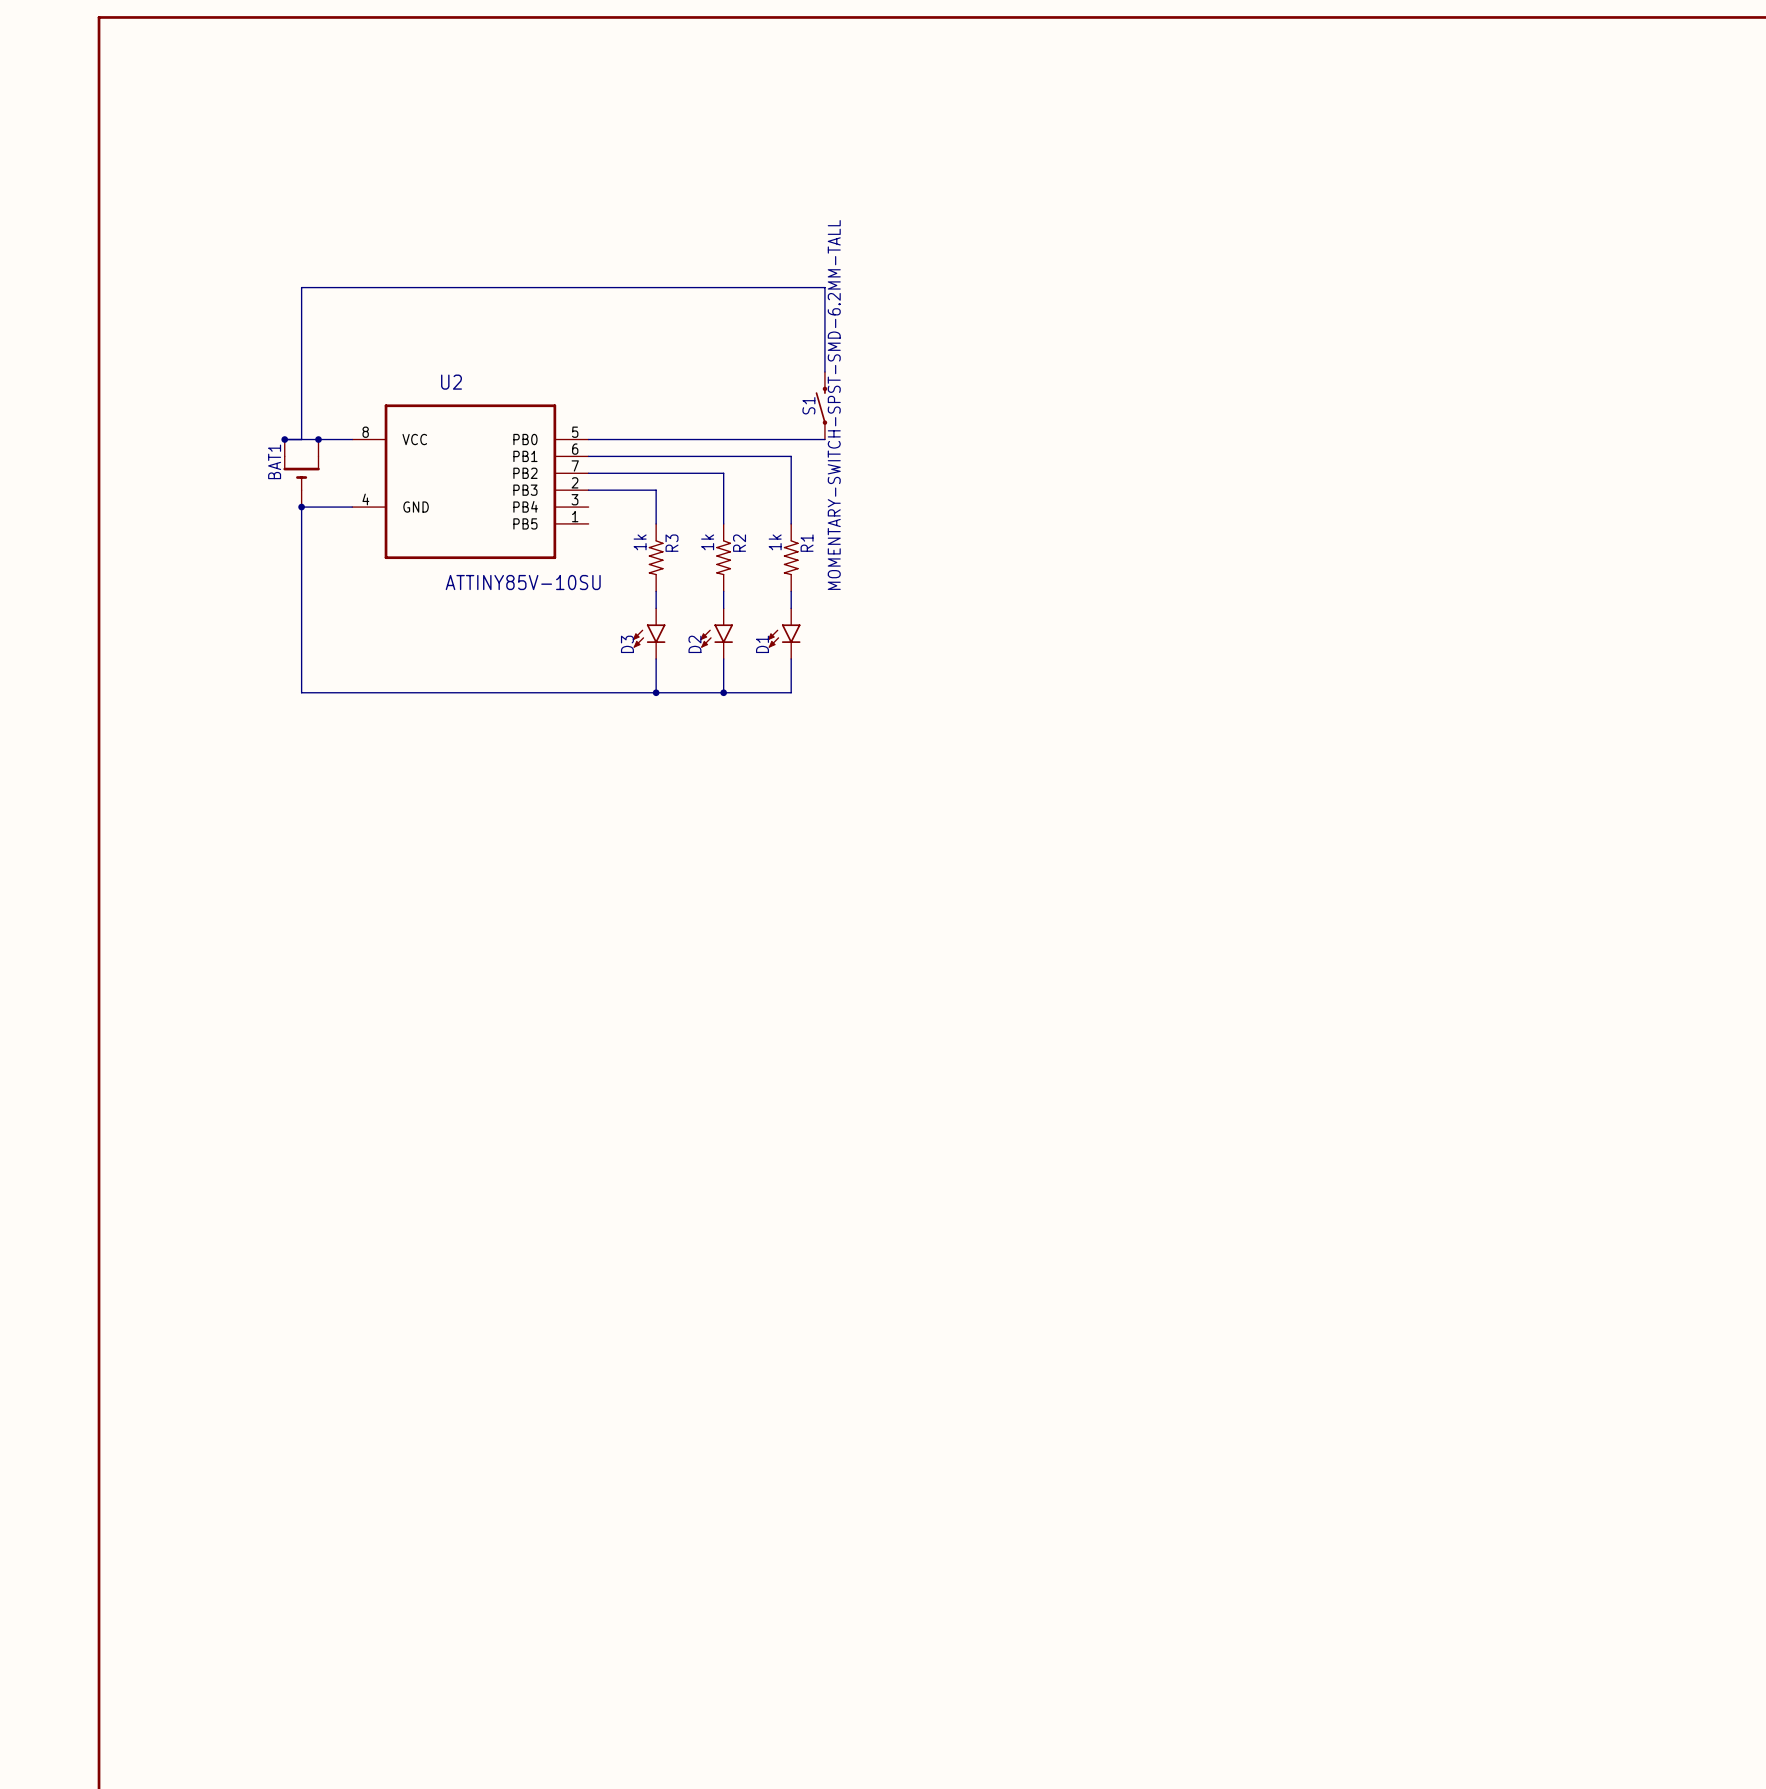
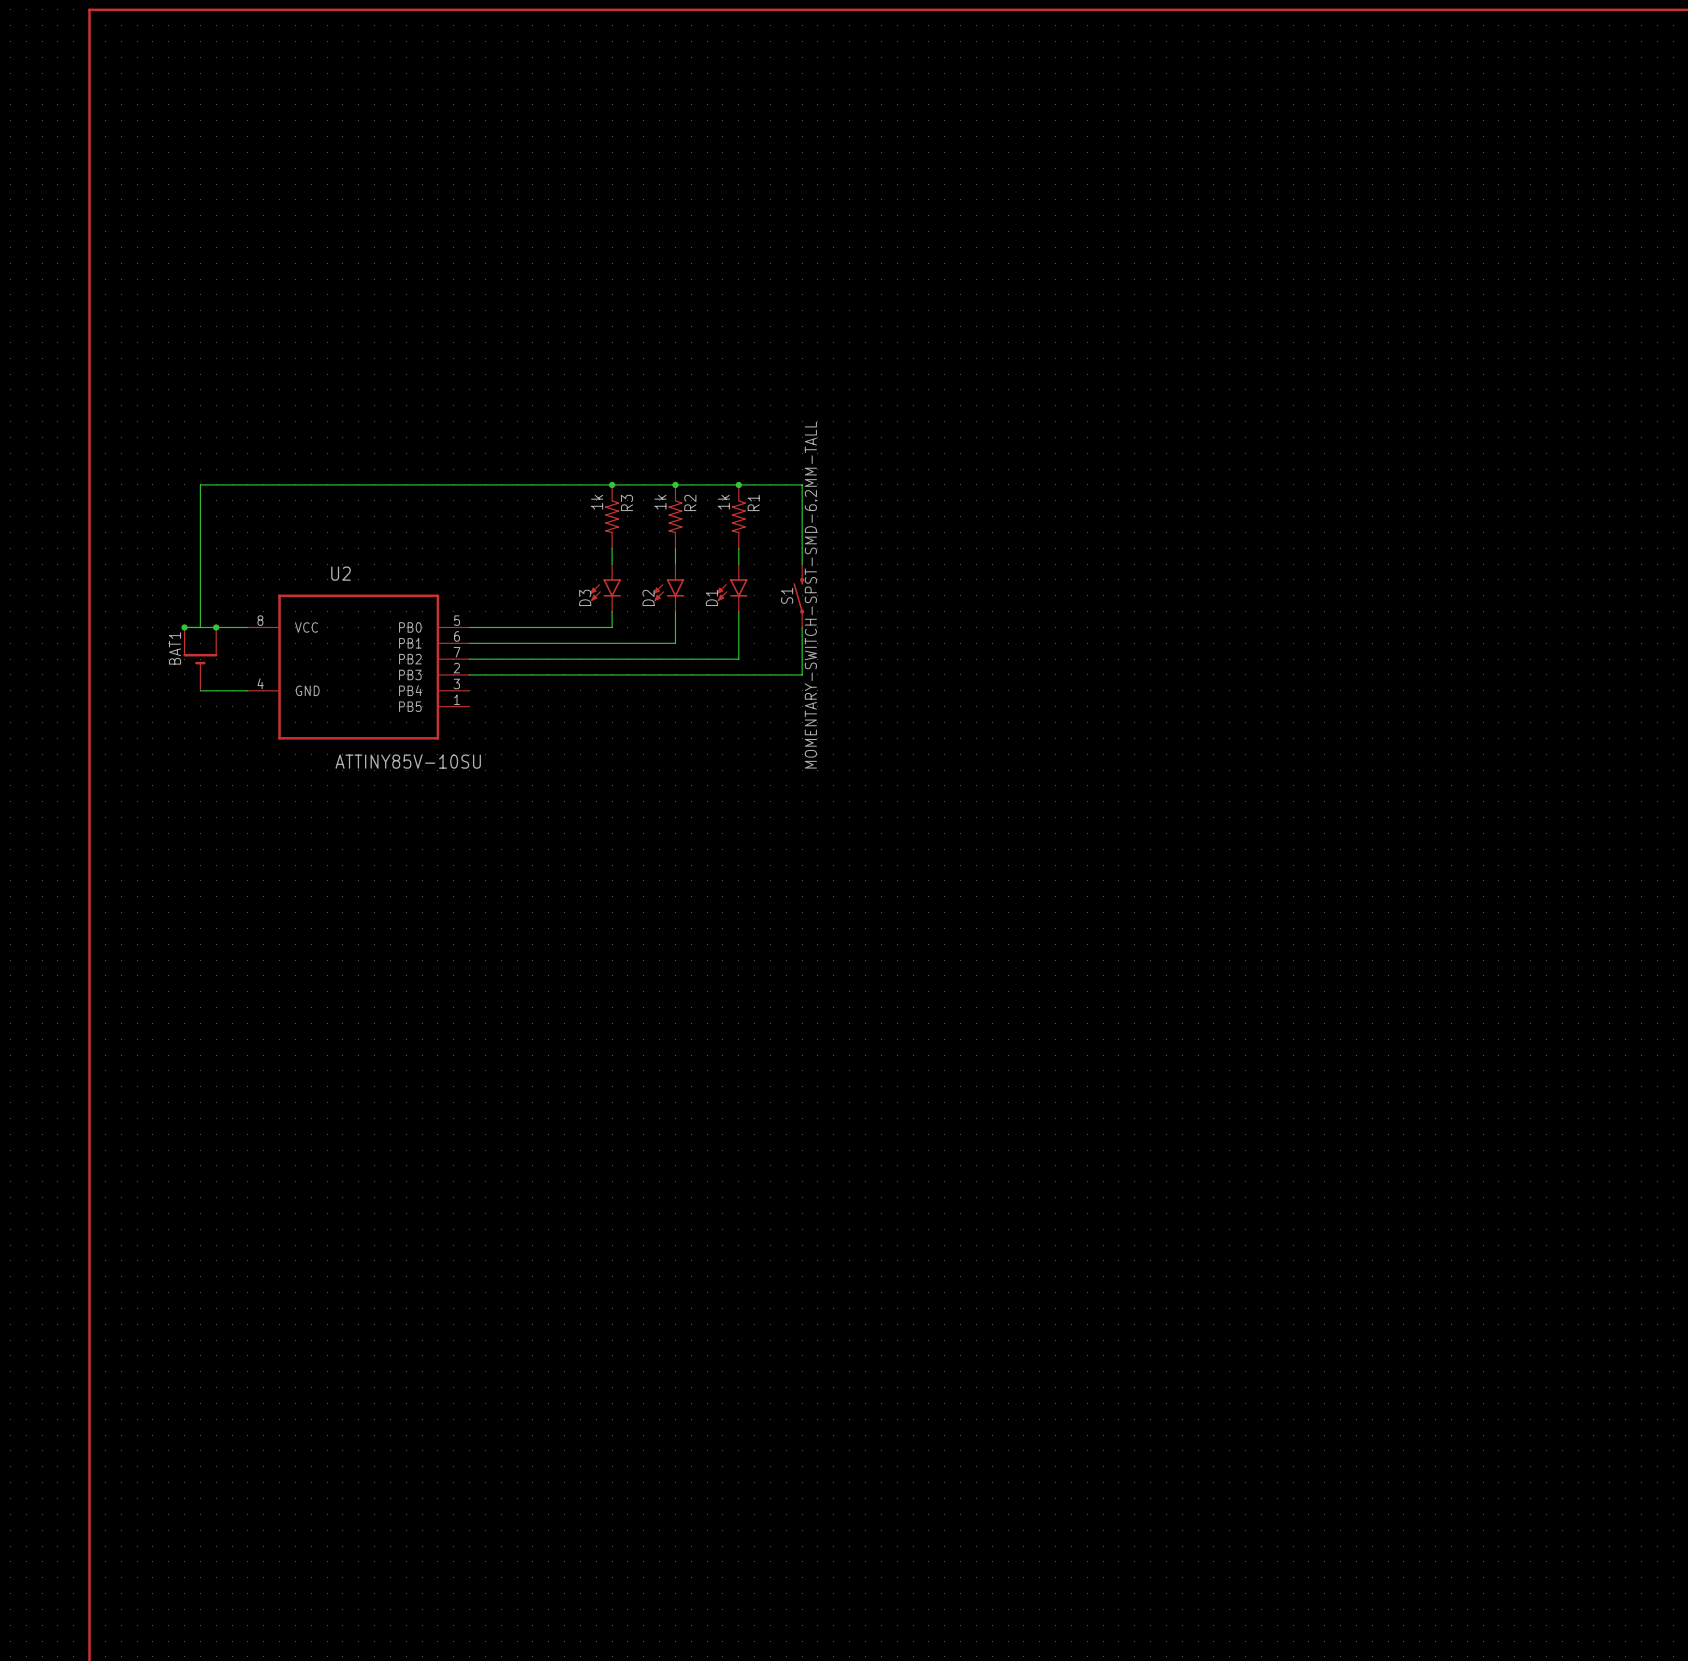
wire: (824, 371) (824, 287) (301, 287) (301, 439) -> none
S1 position: (821, 405) -> (798, 595)
wire: (284, 439) (352, 439) -> none
junction: (284, 439) -> none
junction: (318, 439) -> none
wire: (588, 439) (824, 439) -> none
wire: (588, 456) (791, 456) (791, 523) -> none
BAT1 position: (301, 473) -> (200, 659)
wire: (588, 473) (723, 473) (723, 523) -> none
U2 position: (470, 481) -> (358, 667)
wire: (588, 490) (656, 490) (656, 523) -> none
junction: (301, 507) -> none
wire: (352, 507) (301, 507) (301, 692) (504, 692) -> none
junction: none -> (612, 484)
junction: none -> (675, 484)
junction: none -> (738, 484)
wire: none -> (802, 564) (802, 484) (200, 484) (200, 627)
wire: none -> (184, 627) (247, 627)
junction: none -> (184, 627)
junction: none -> (216, 627)
wire: (656, 675) (656, 692) -> (612, 627) (469, 627)
wire: none -> (802, 627) (802, 674) (469, 674)
junction: (656, 692) -> none
wire: (723, 692) (791, 692) -> (469, 659) (738, 659) (738, 643)
junction: (723, 692) -> none
wire: none -> (200, 690) (247, 690)

